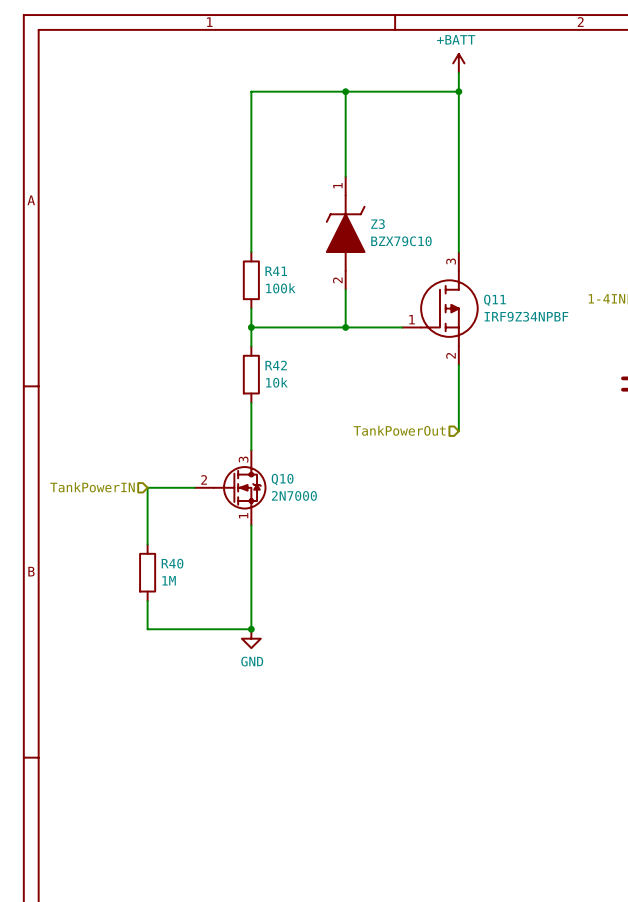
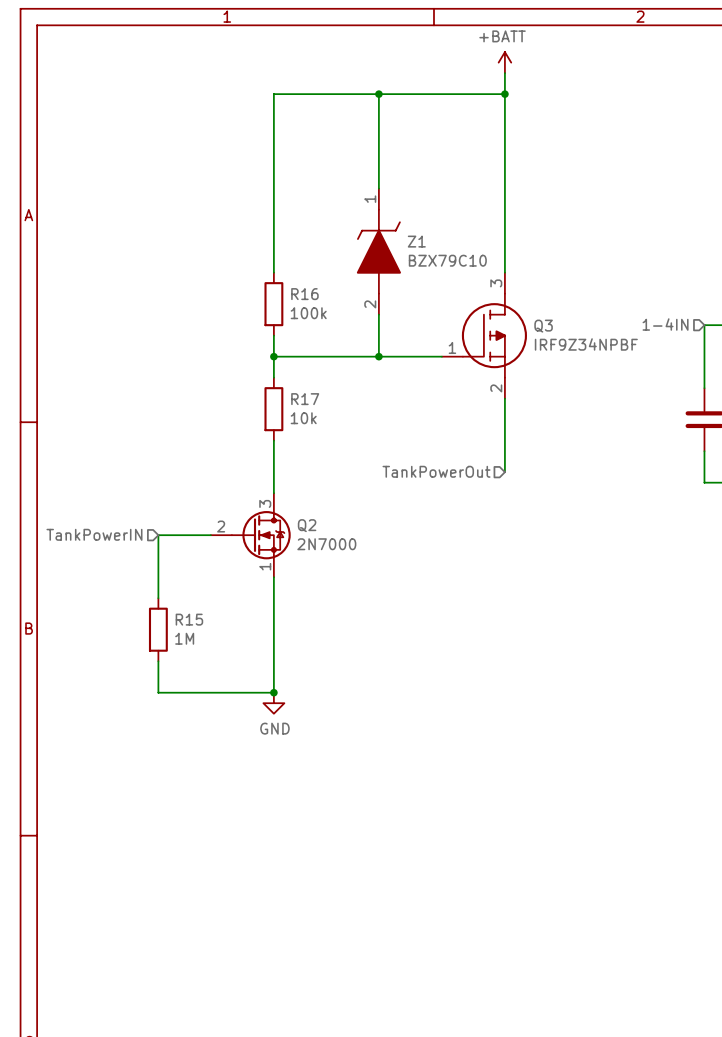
Z3 name: Z3 (377, 224) -> Z1 (416, 241)
R41 name: R41 (276, 271) -> R16 (304, 294)
Q11 name: Q11 (494, 300) -> Q3 (543, 326)
R42 name: R42 (276, 365) -> R17 (305, 399)
Q10 name: Q10 (282, 479) -> Q2 (307, 525)
R40 name: R40 (172, 563) -> R15 (189, 619)

